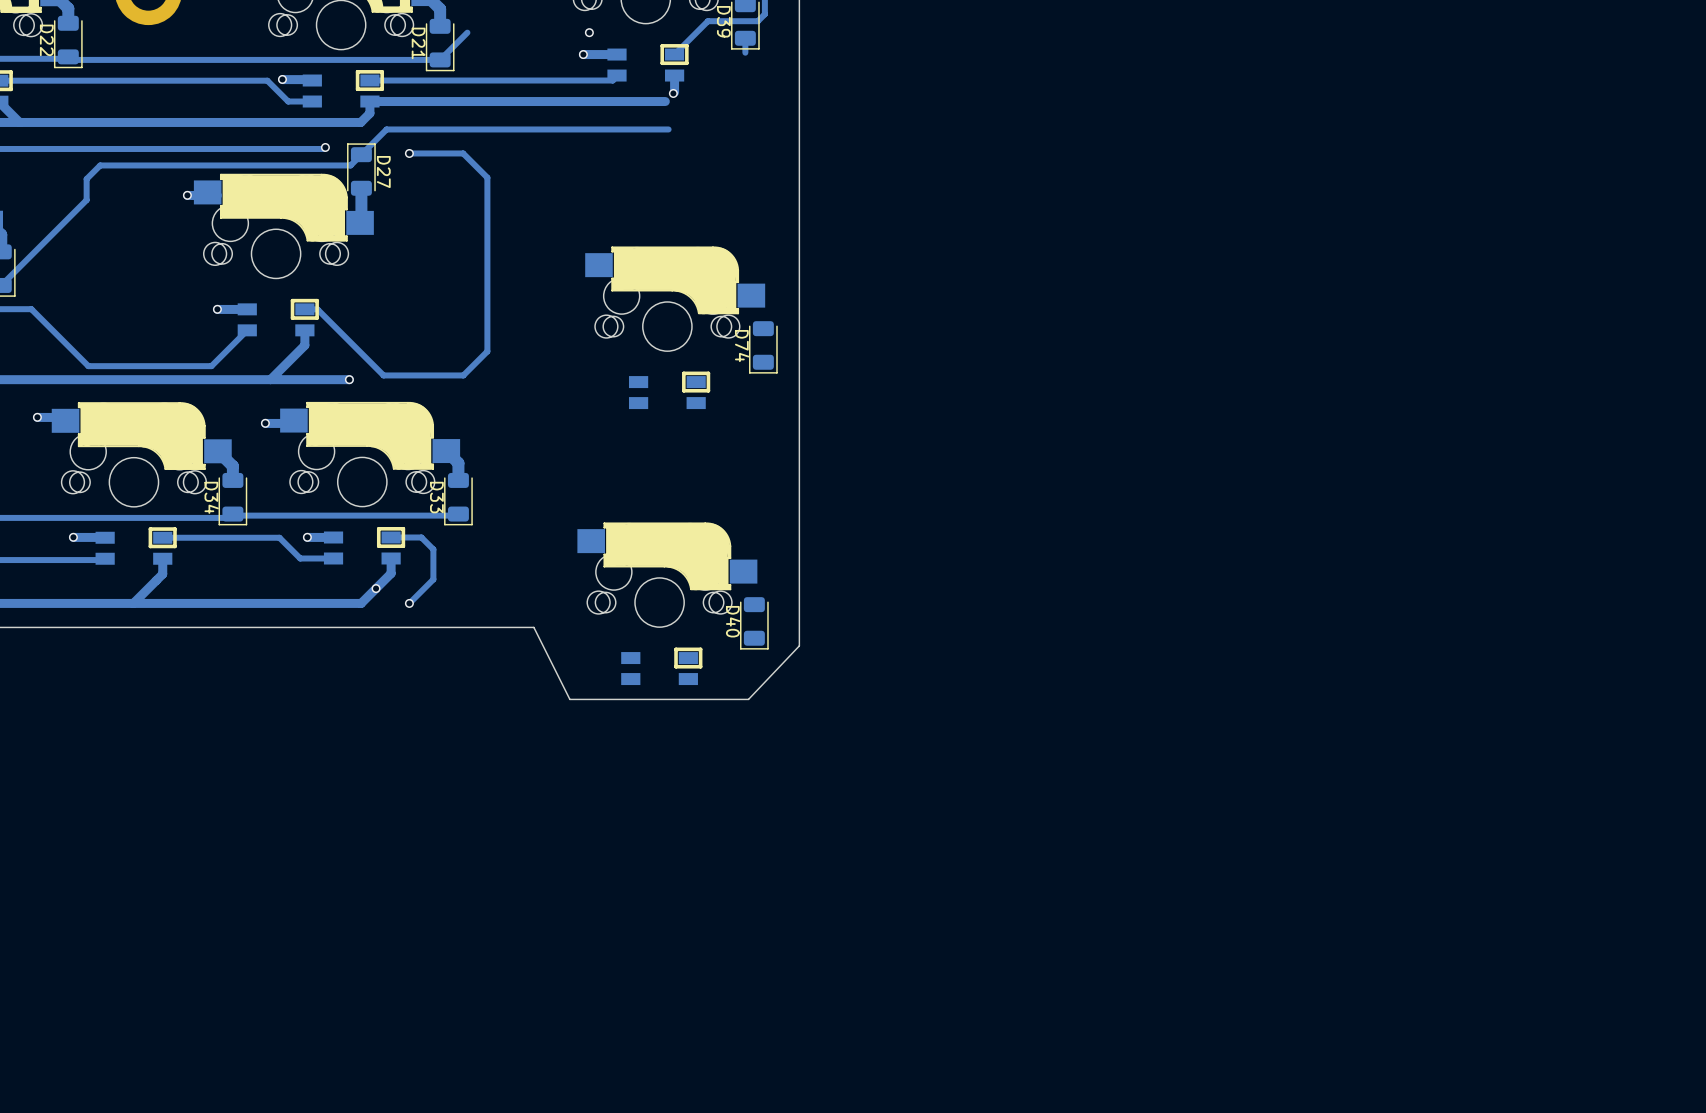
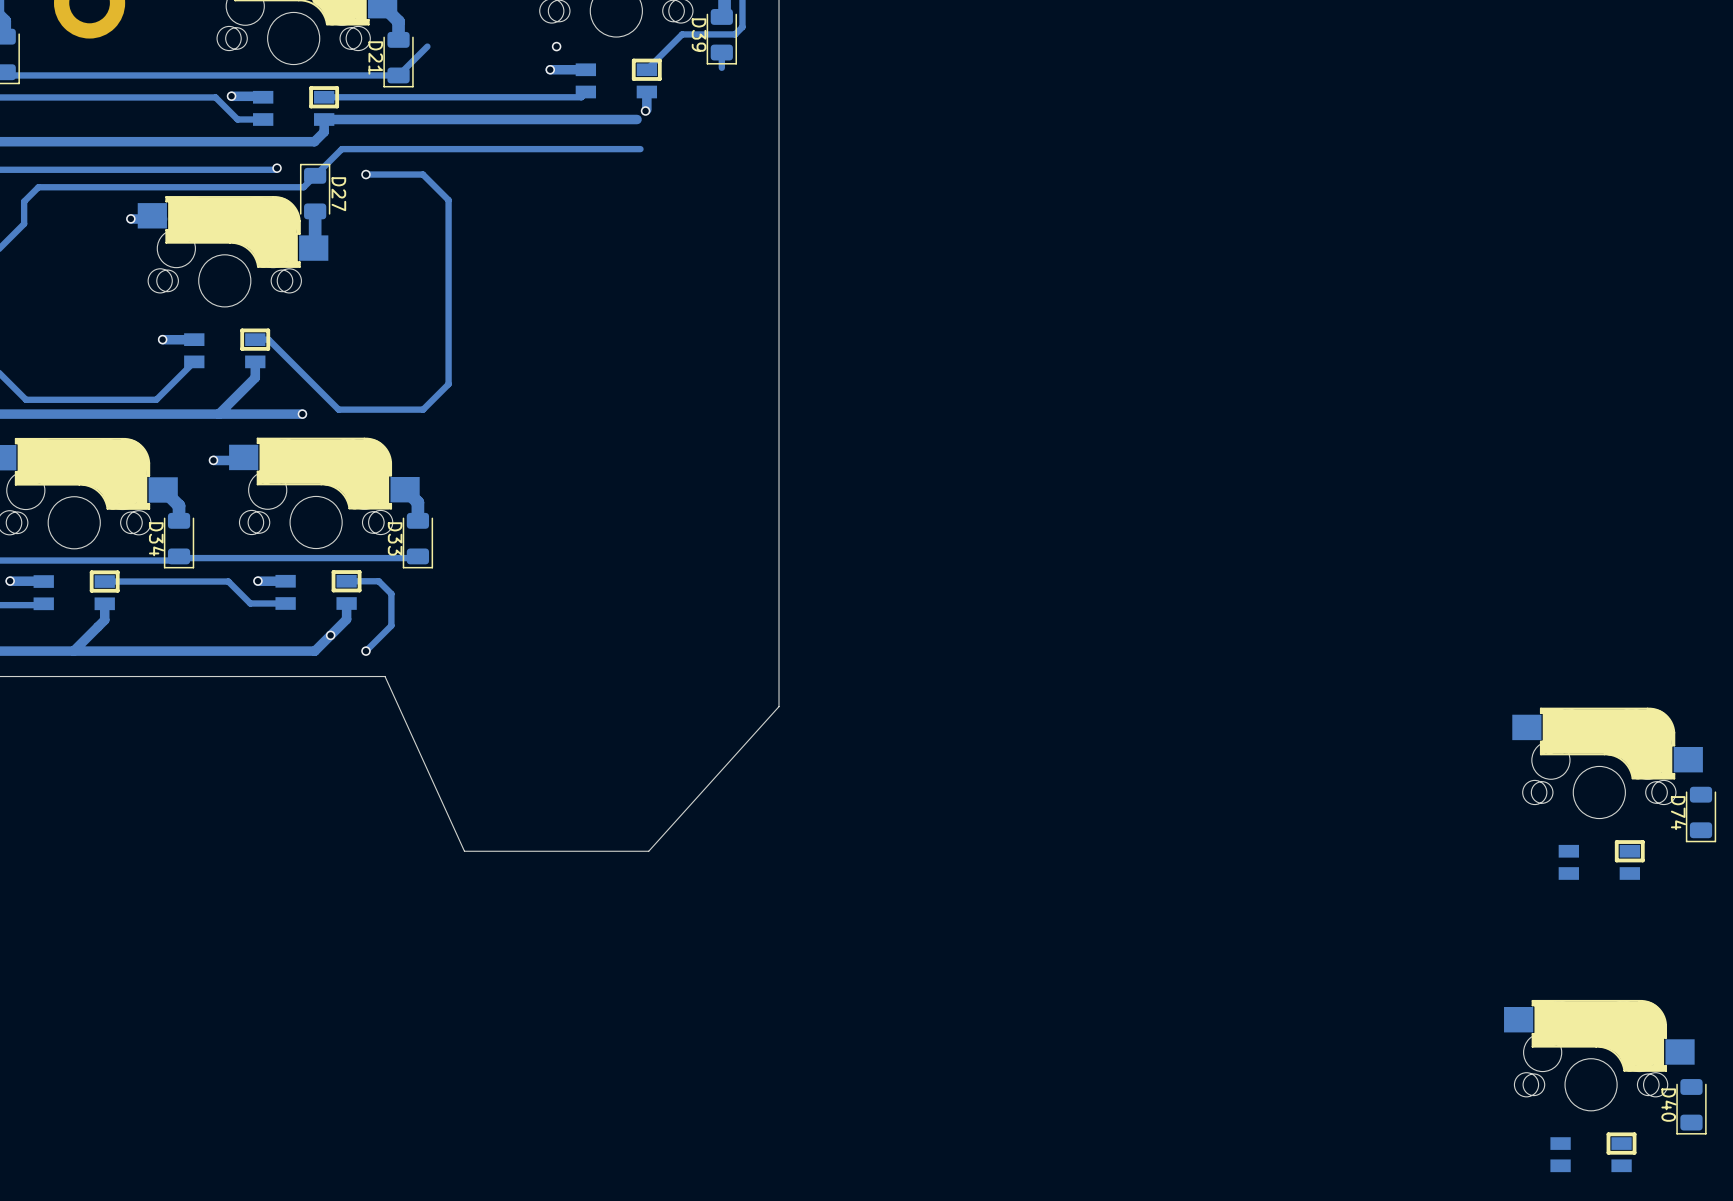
part: (675, 327) -> none
D74 position: (763, 347) -> (1701, 814)
part: (667, 603) -> none
D40 position: (754, 623) -> (1691, 1106)
board edge: (427, 627) (533, 627) (569, 699) (748, 699) (799, 645) -> (385, 676) (464, 851) (648, 851) (779, 706) (779, 696)
part: none -> (1607, 793)
part: none -> (1599, 1086)

